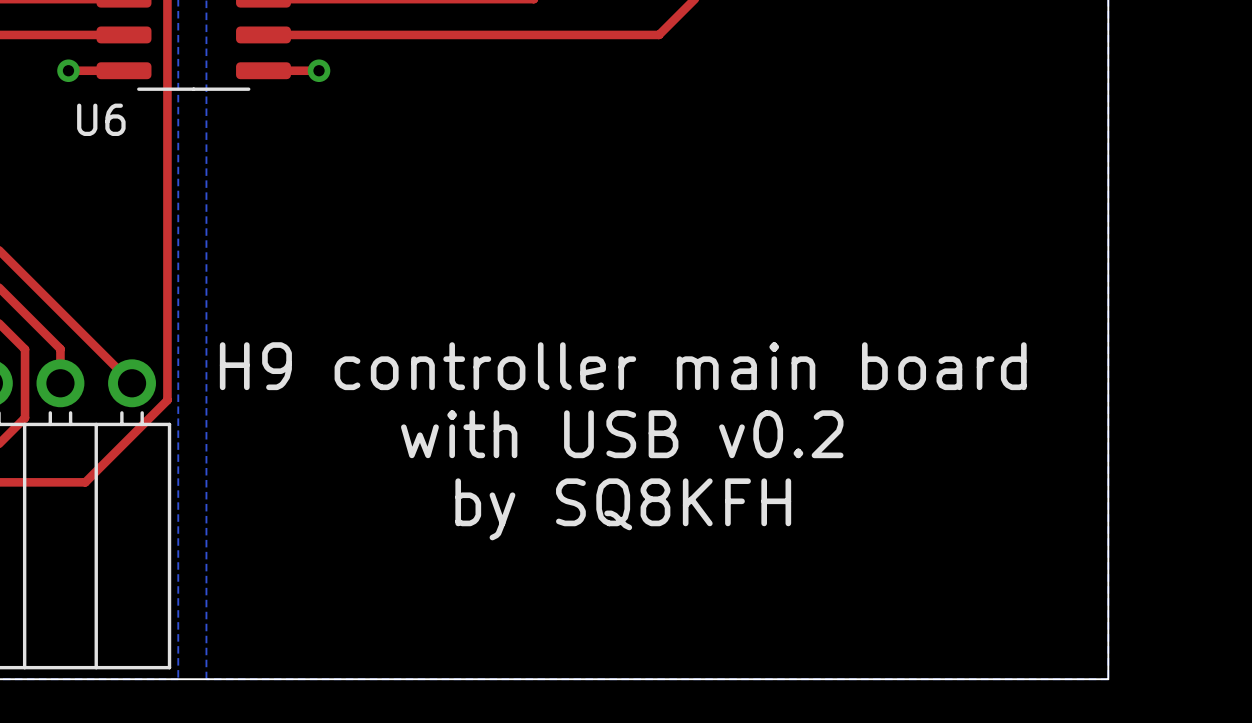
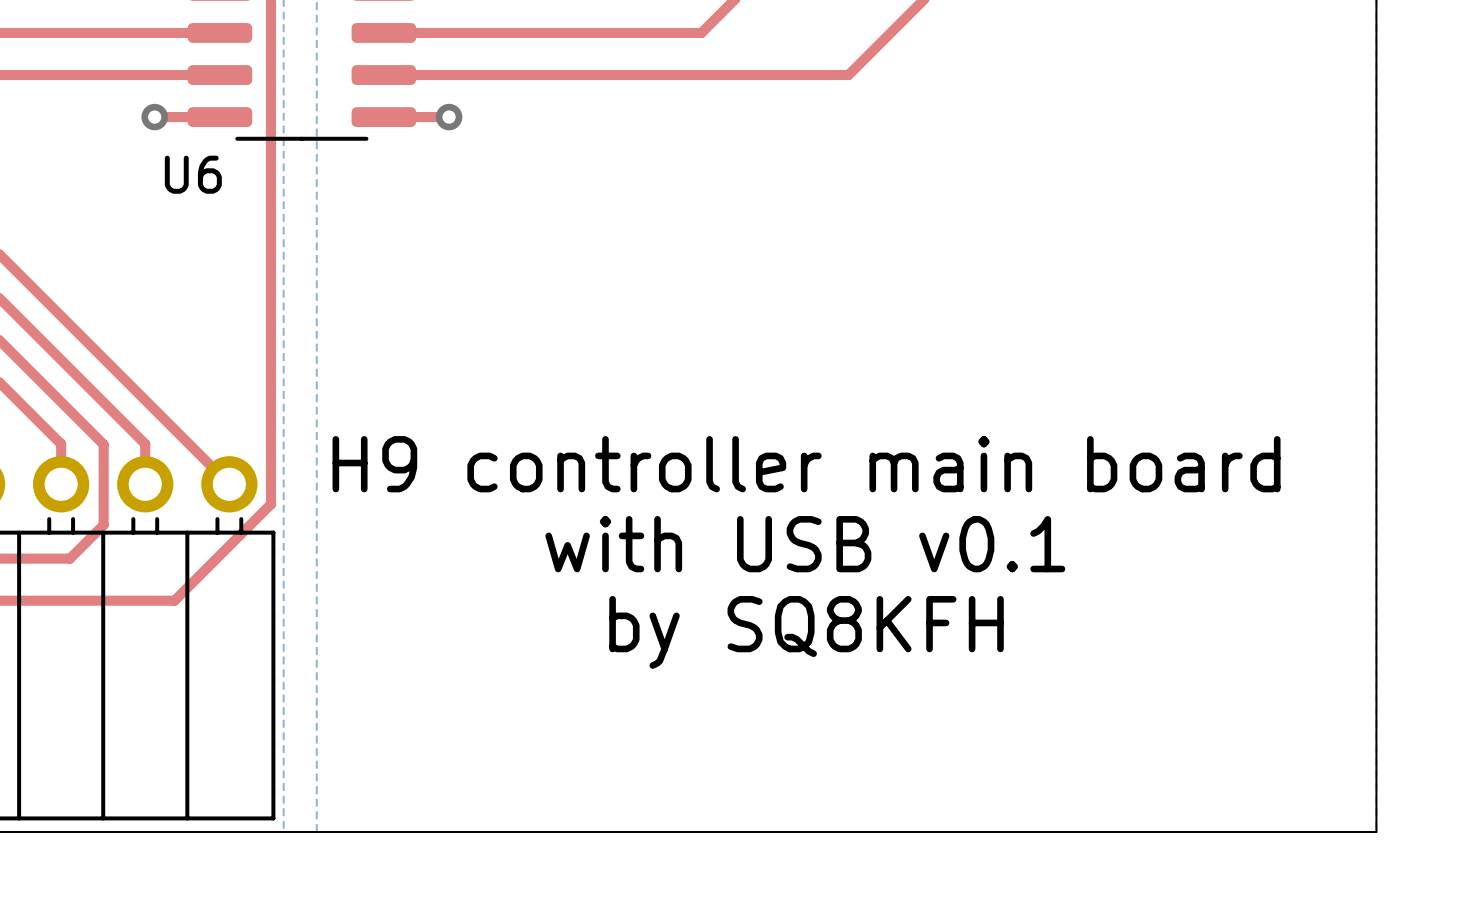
text: with USB v0.2 (622, 434) -> with USB v0.1 (805, 544)

